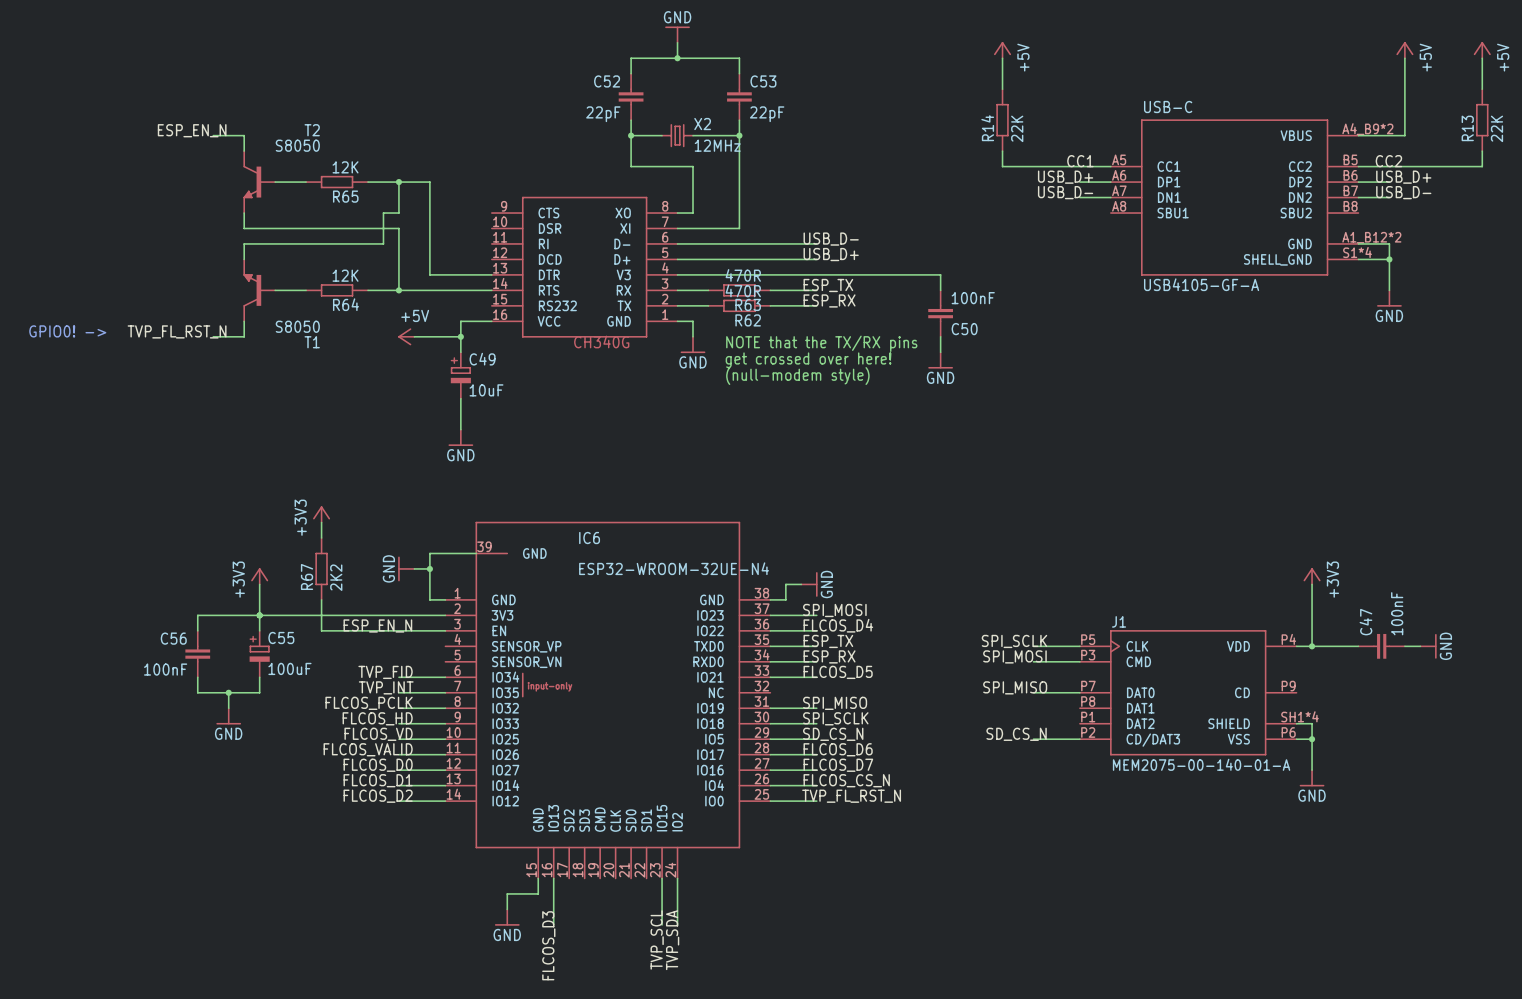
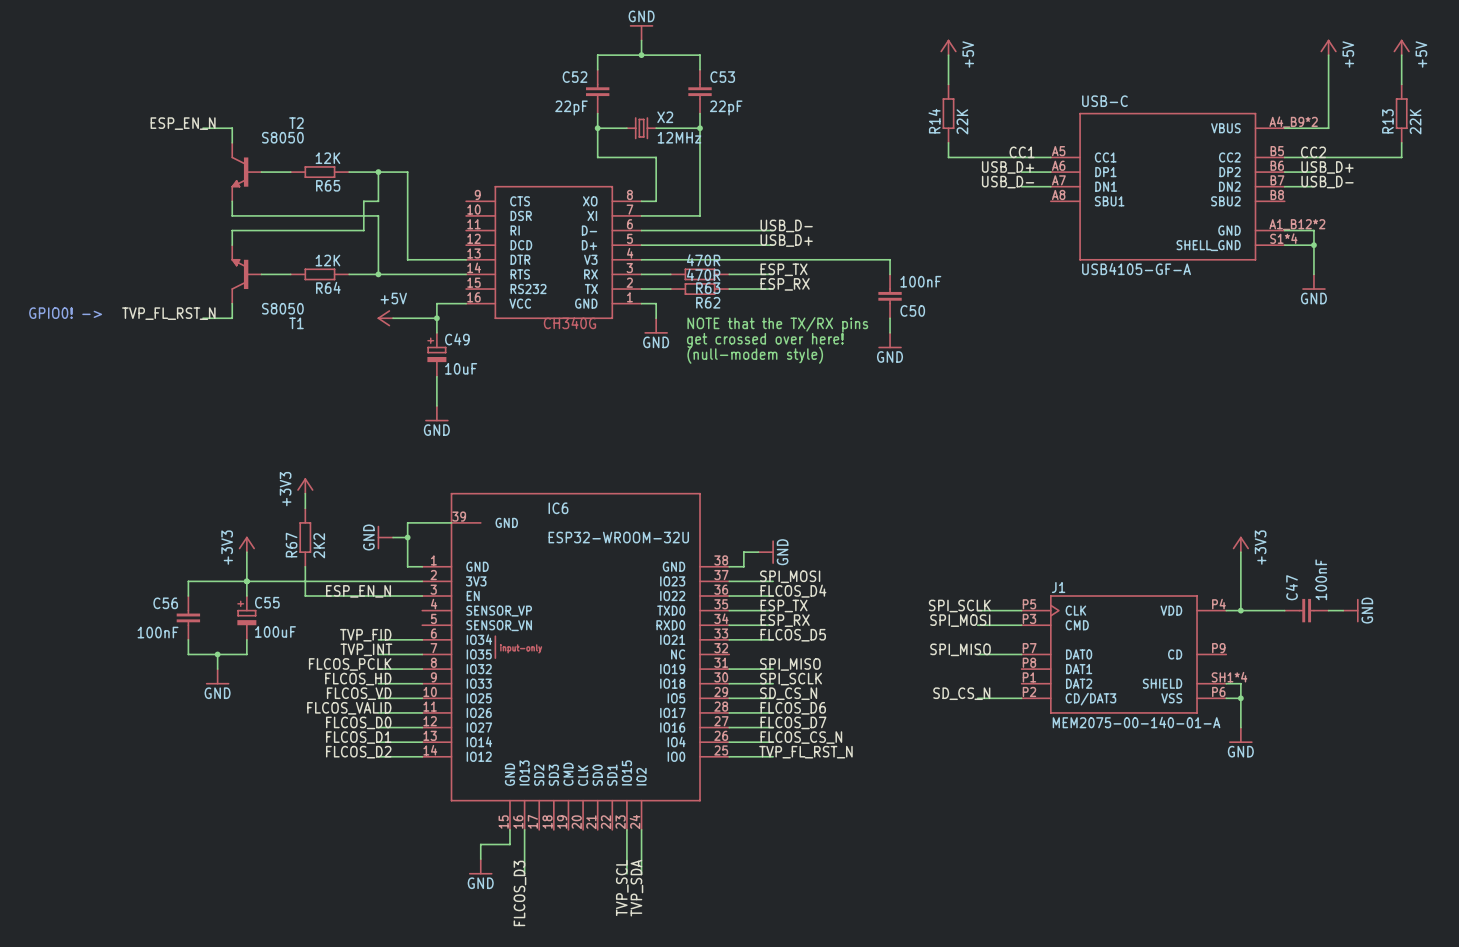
IC6 value: ESP32-WROOM-32UE-N4 (674, 568) -> ESP32-WROOM-32U (618, 537)

